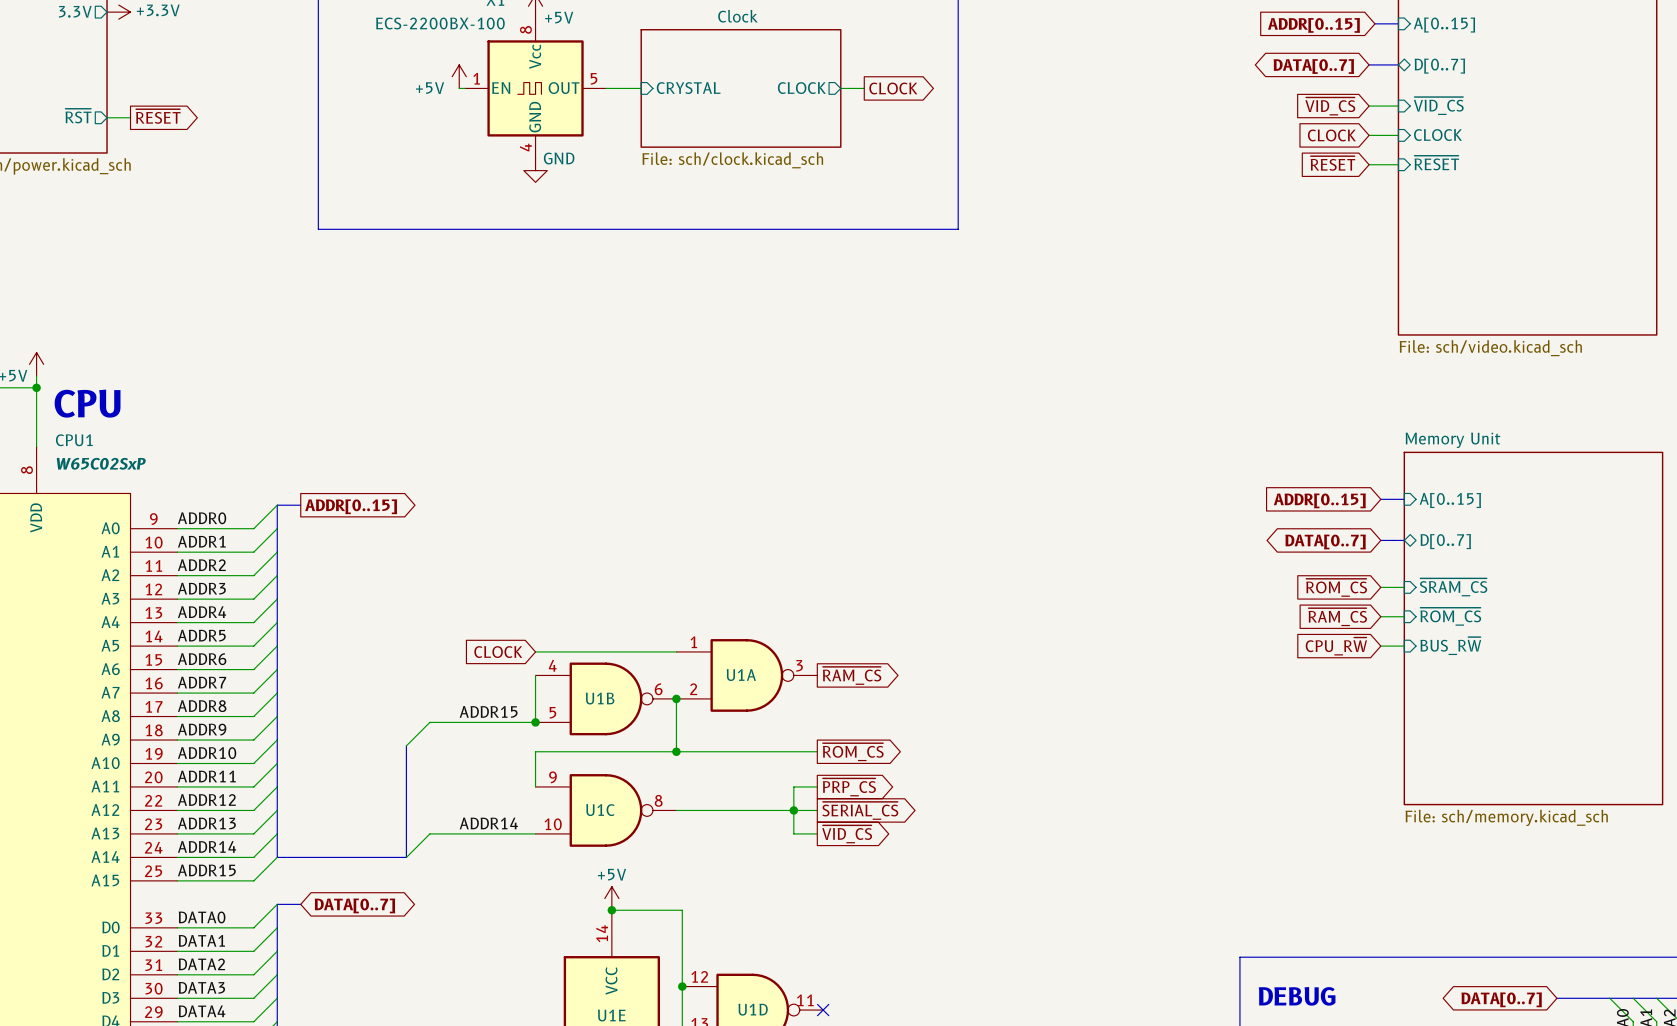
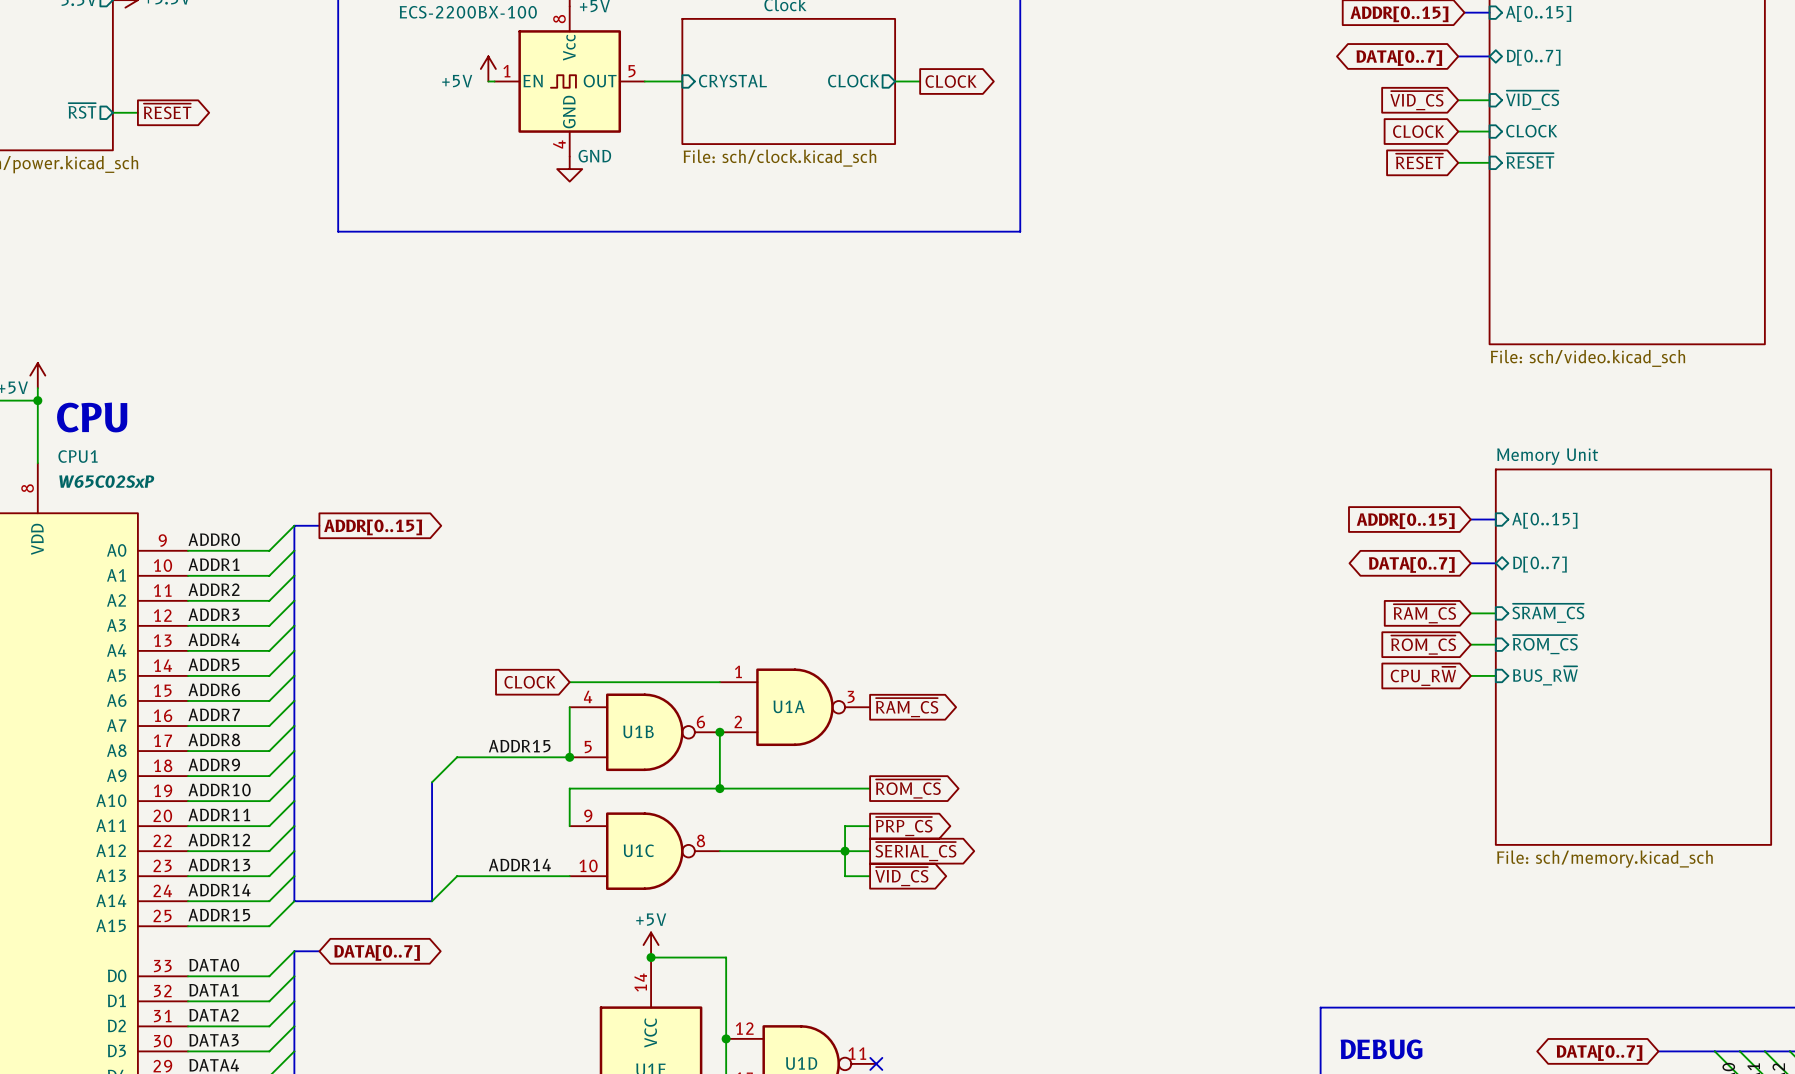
global label: ~{ROM_CS} (1336, 587) -> ~{RAM_CS} (1424, 613)
global label: ~{RAM_CS} (1337, 617) -> ~{ROM_CS} (1423, 645)

